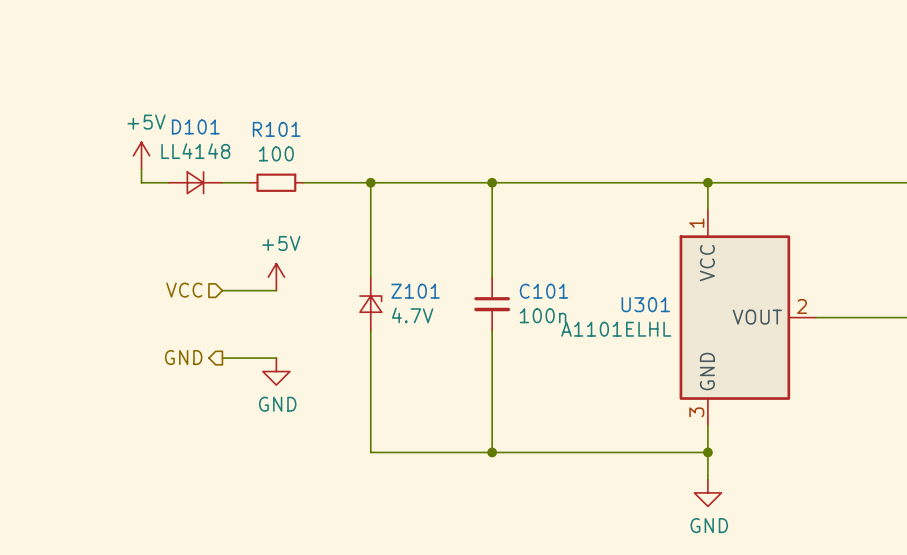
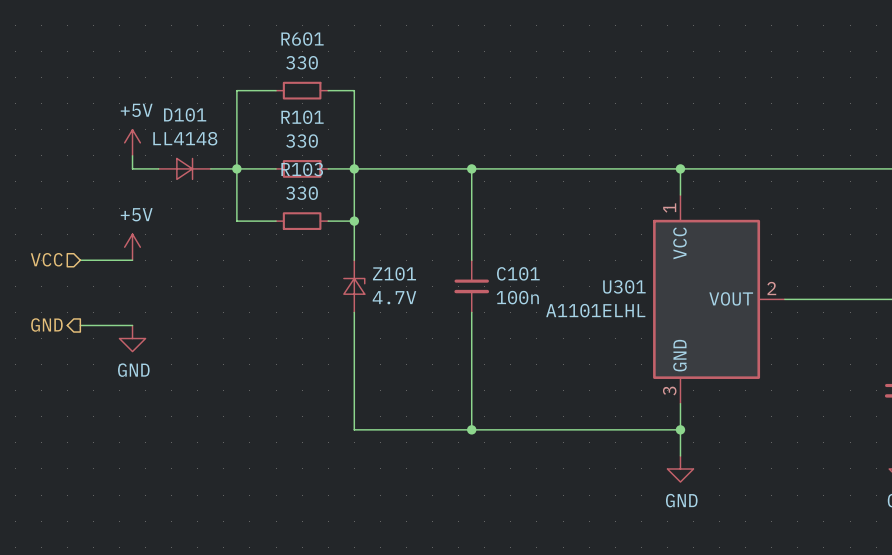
wire: none -> (276, 90) (236, 90) (236, 221) (276, 221)
R601: none -> 330 (302, 90)
wire: none -> (328, 90) (354, 90) (354, 168)
R101 value: 100 (276, 153) -> 330 (302, 141)
junction: none -> (236, 168)
R101 position: (276, 182) -> (302, 168)
wire: (303, 182) (343, 182) -> (236, 168) (276, 168)
R103: none -> 330 (302, 221)
wire: none -> (328, 221) (354, 221)
junction: none -> (354, 221)
power symbol position: +5V (276, 277) -> +5V (132, 247)
hierarchical label position: VCC (184, 290) -> VCC (46, 259)
wire: (222, 290) (276, 290) -> (80, 260) (132, 260)
hierarchical label position: GND (183, 357) -> GND (46, 324)
wire: (222, 358) (276, 358) -> (80, 325) (132, 325)
power symbol position: GND (276, 371) -> GND (132, 338)

